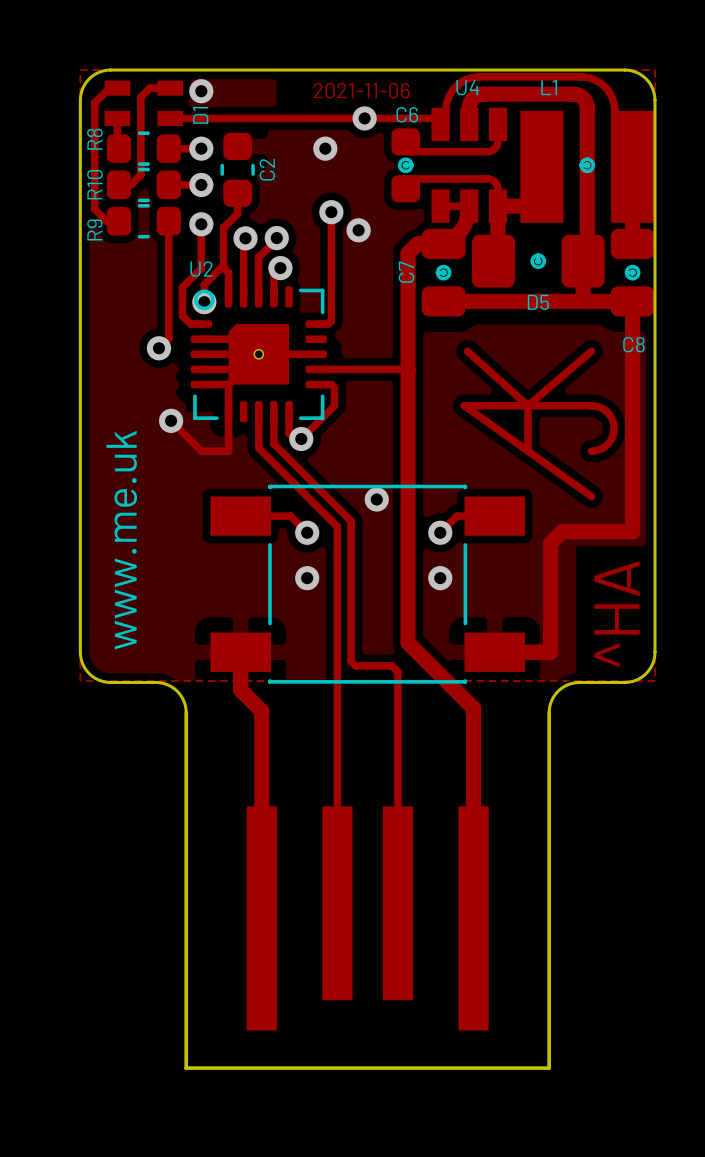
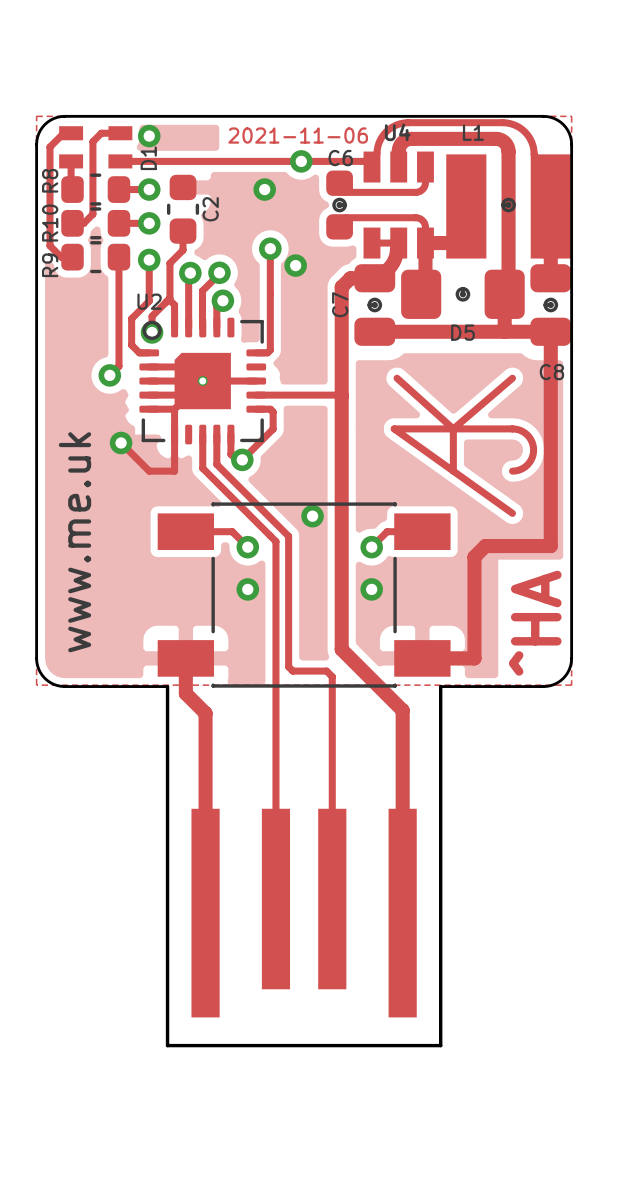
board edge: (155, 682) (167, 684) (177, 691) (183, 701) (186, 712) -> (107, 686) (167, 686)
board edge: (579, 682) (567, 684) (558, 691) (551, 701) (549, 712) -> (501, 686) (440, 686)
part footprint: [184, 710, 551, 1070] -> [165, 684, 443, 1048]

